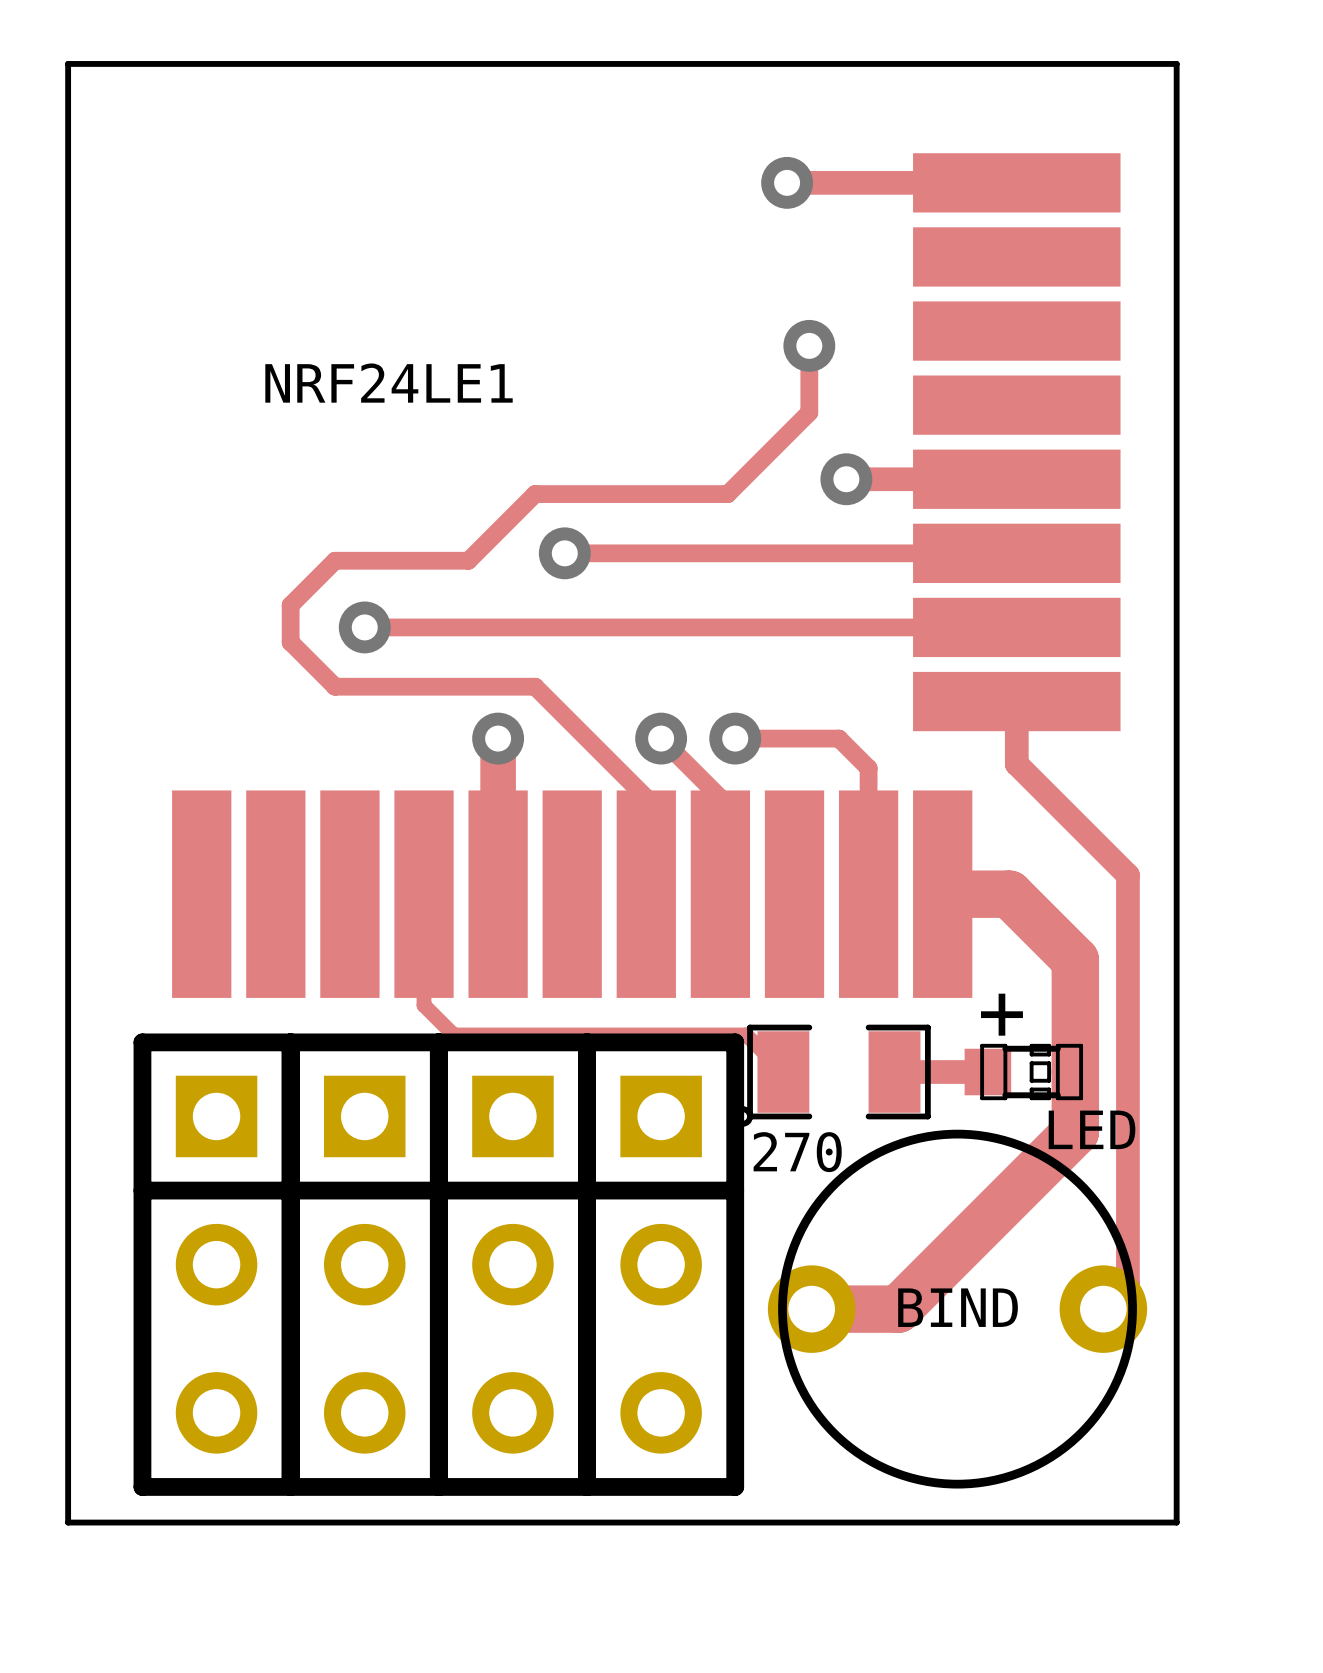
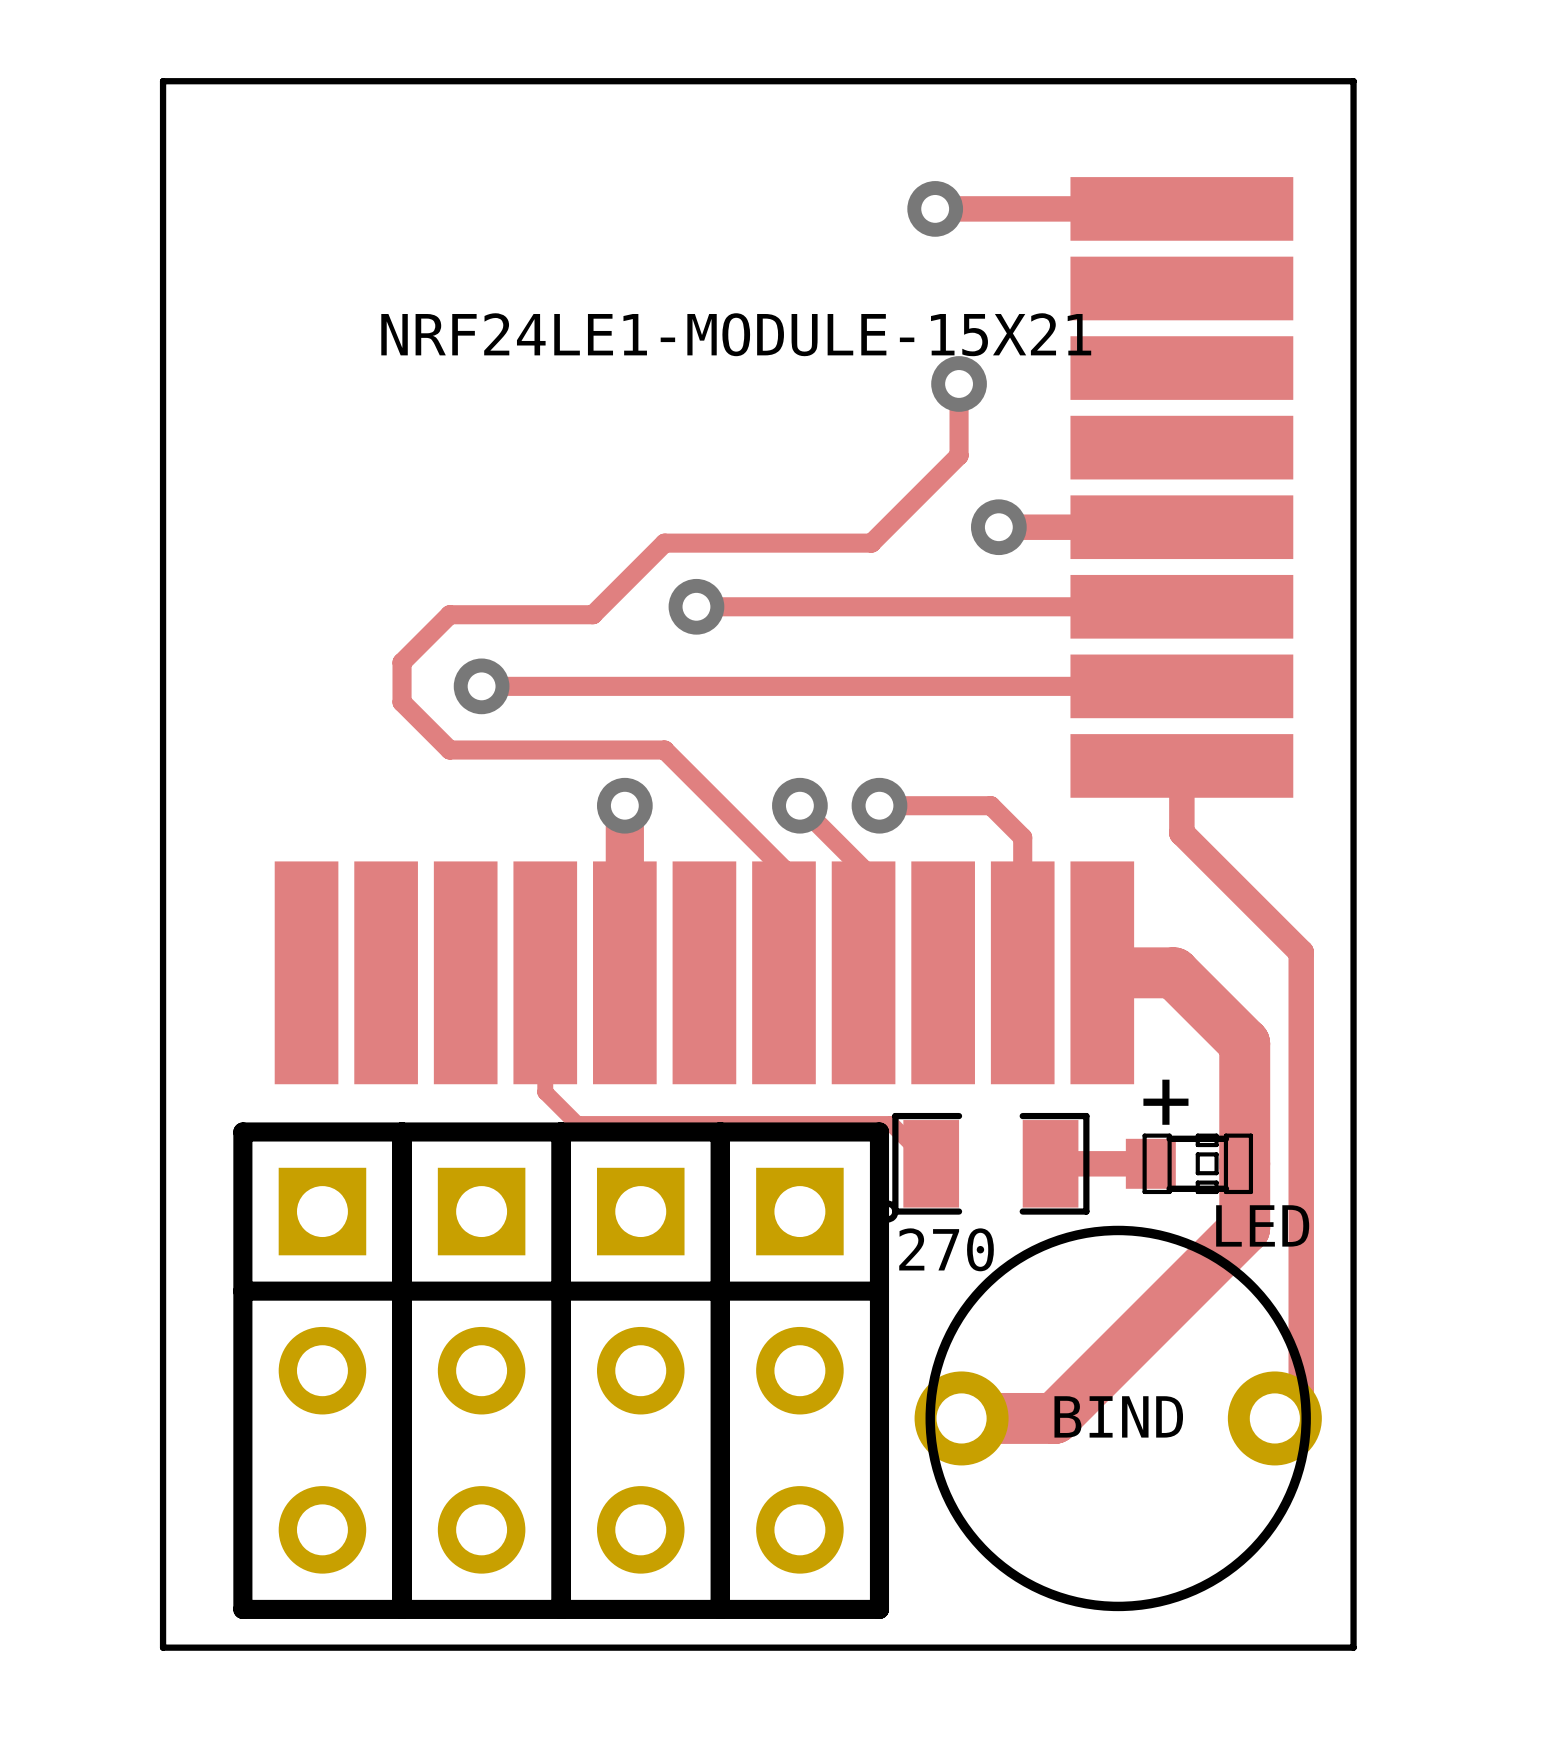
part value: NRF24LE1 (389, 383) -> NRF24LE1-MODULE-15X21 (736, 334)

